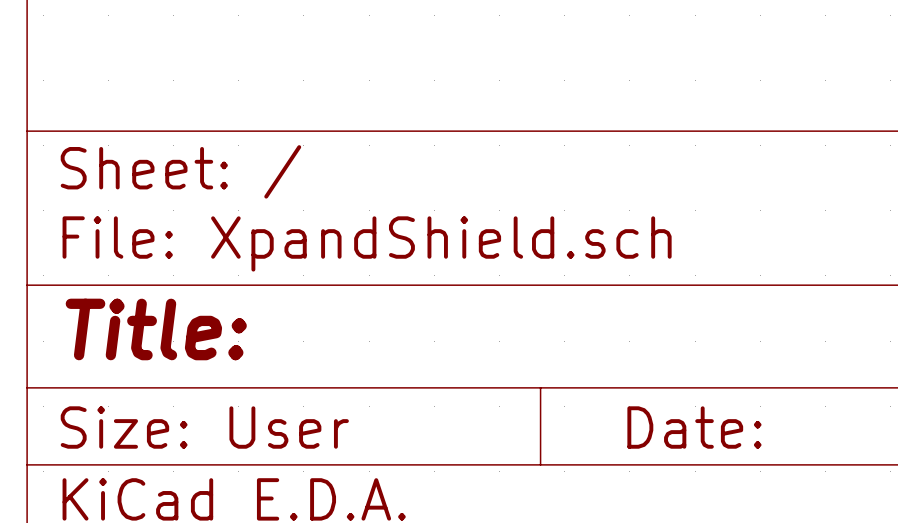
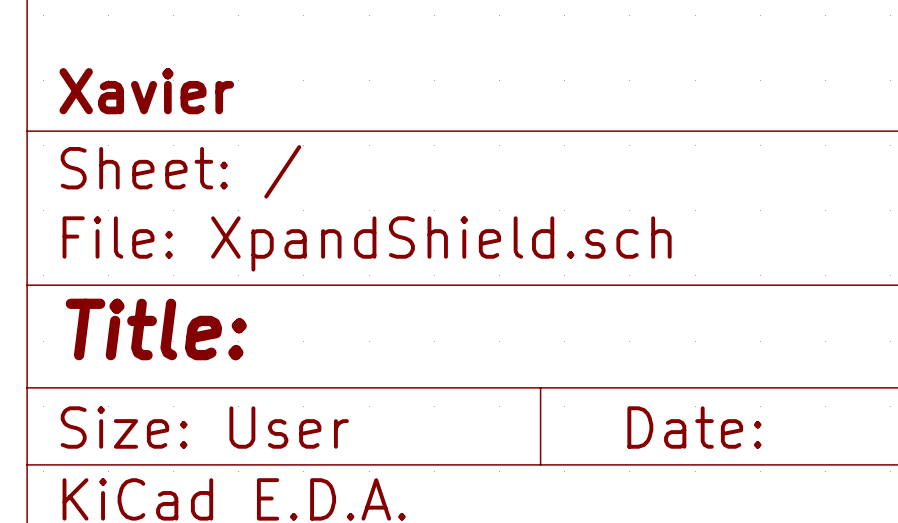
title block: none -> Xavier (146, 91)

